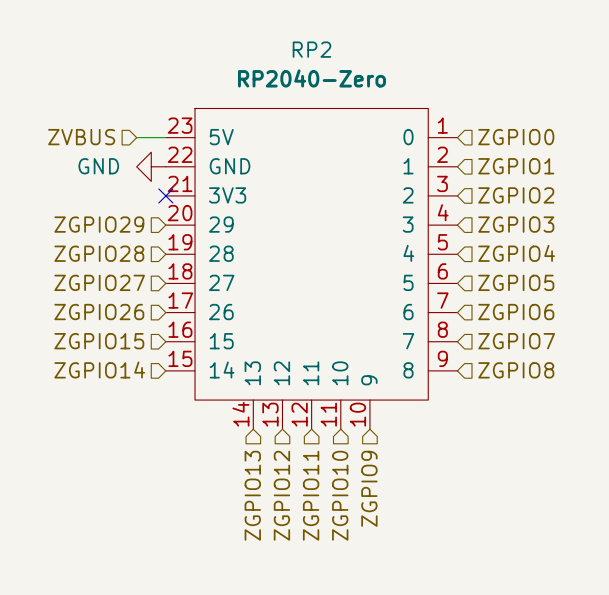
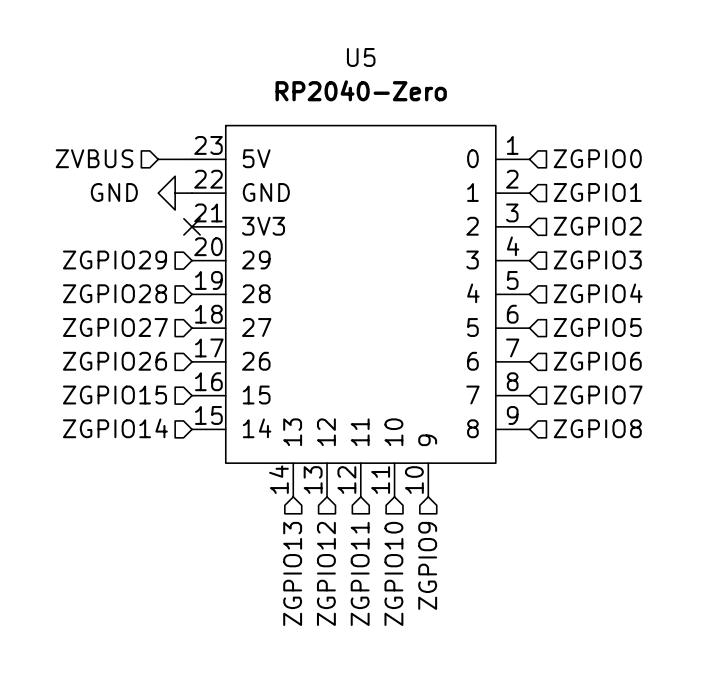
RP2 name: RP2 (311, 49) -> U5 (361, 57)

